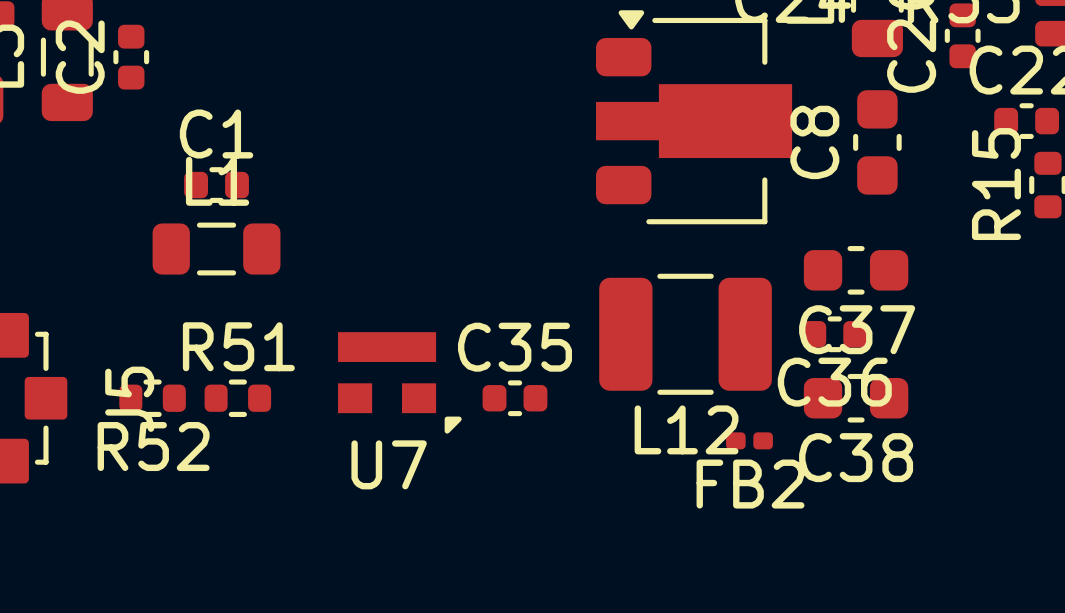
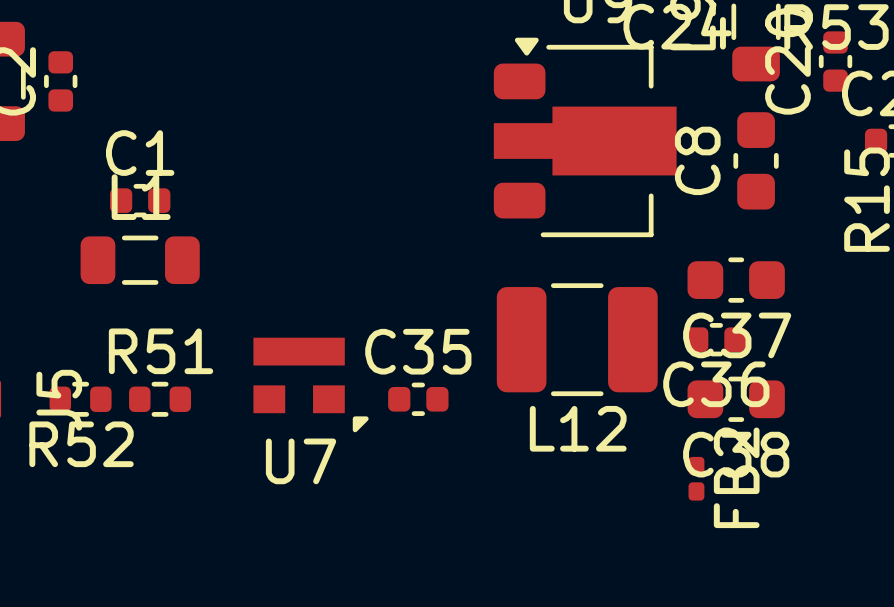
FB2 rotation: 0° (749, 440) -> 90° clockwise (696, 478)
FB2 position: (749, 440) -> (696, 478)

